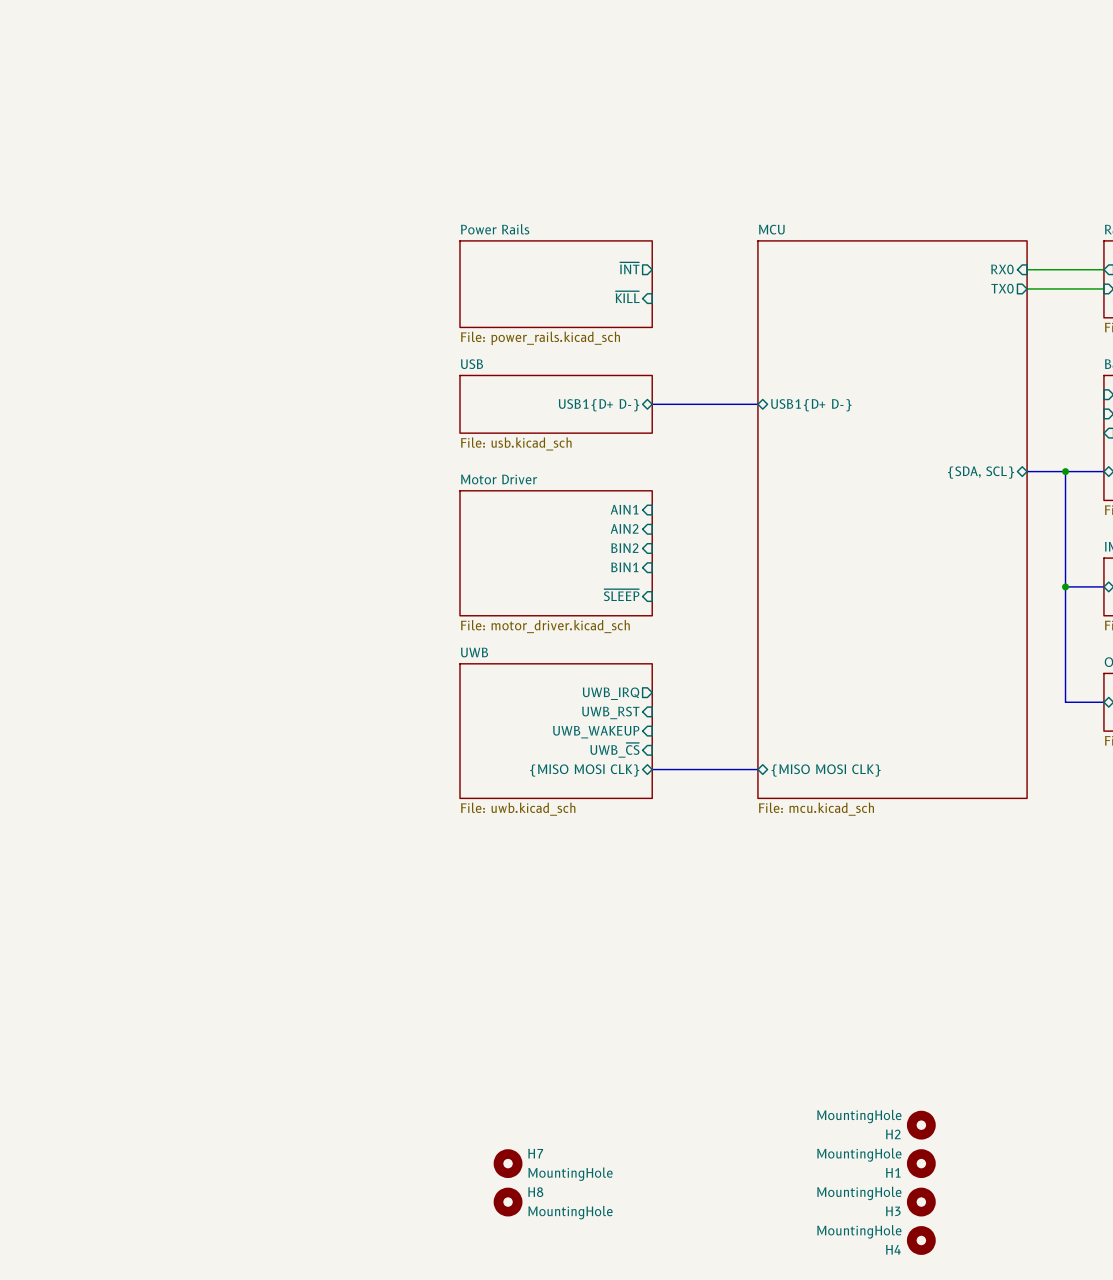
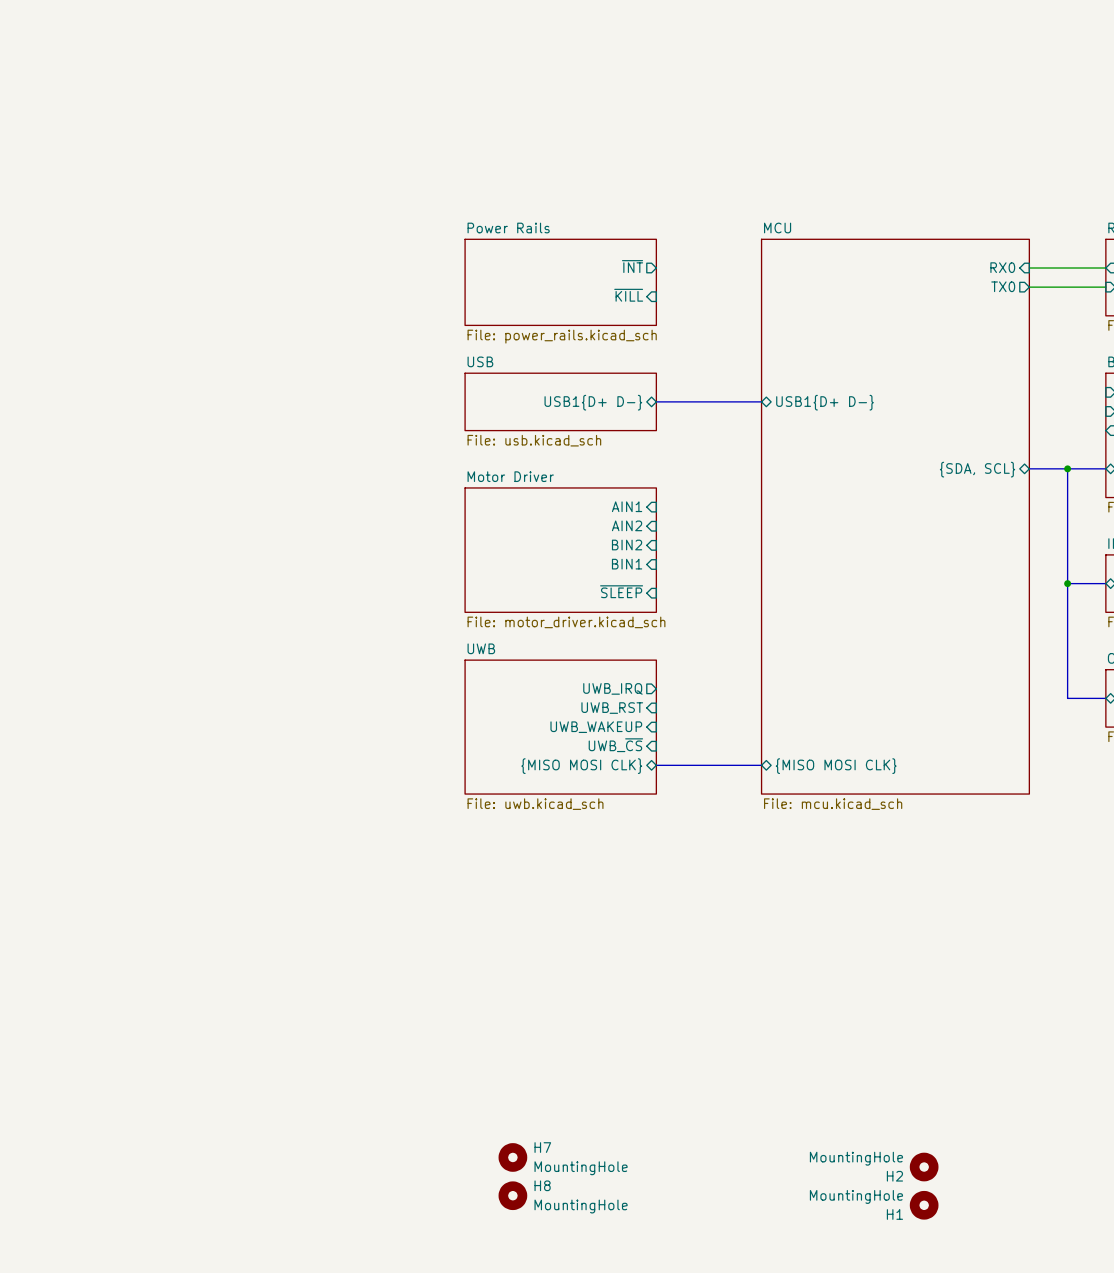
H2 position: (921, 1125) -> (924, 1167)
H1 position: (921, 1163) -> (924, 1205)
H3: MountingHole (921, 1202) -> none
H4: MountingHole (921, 1240) -> none

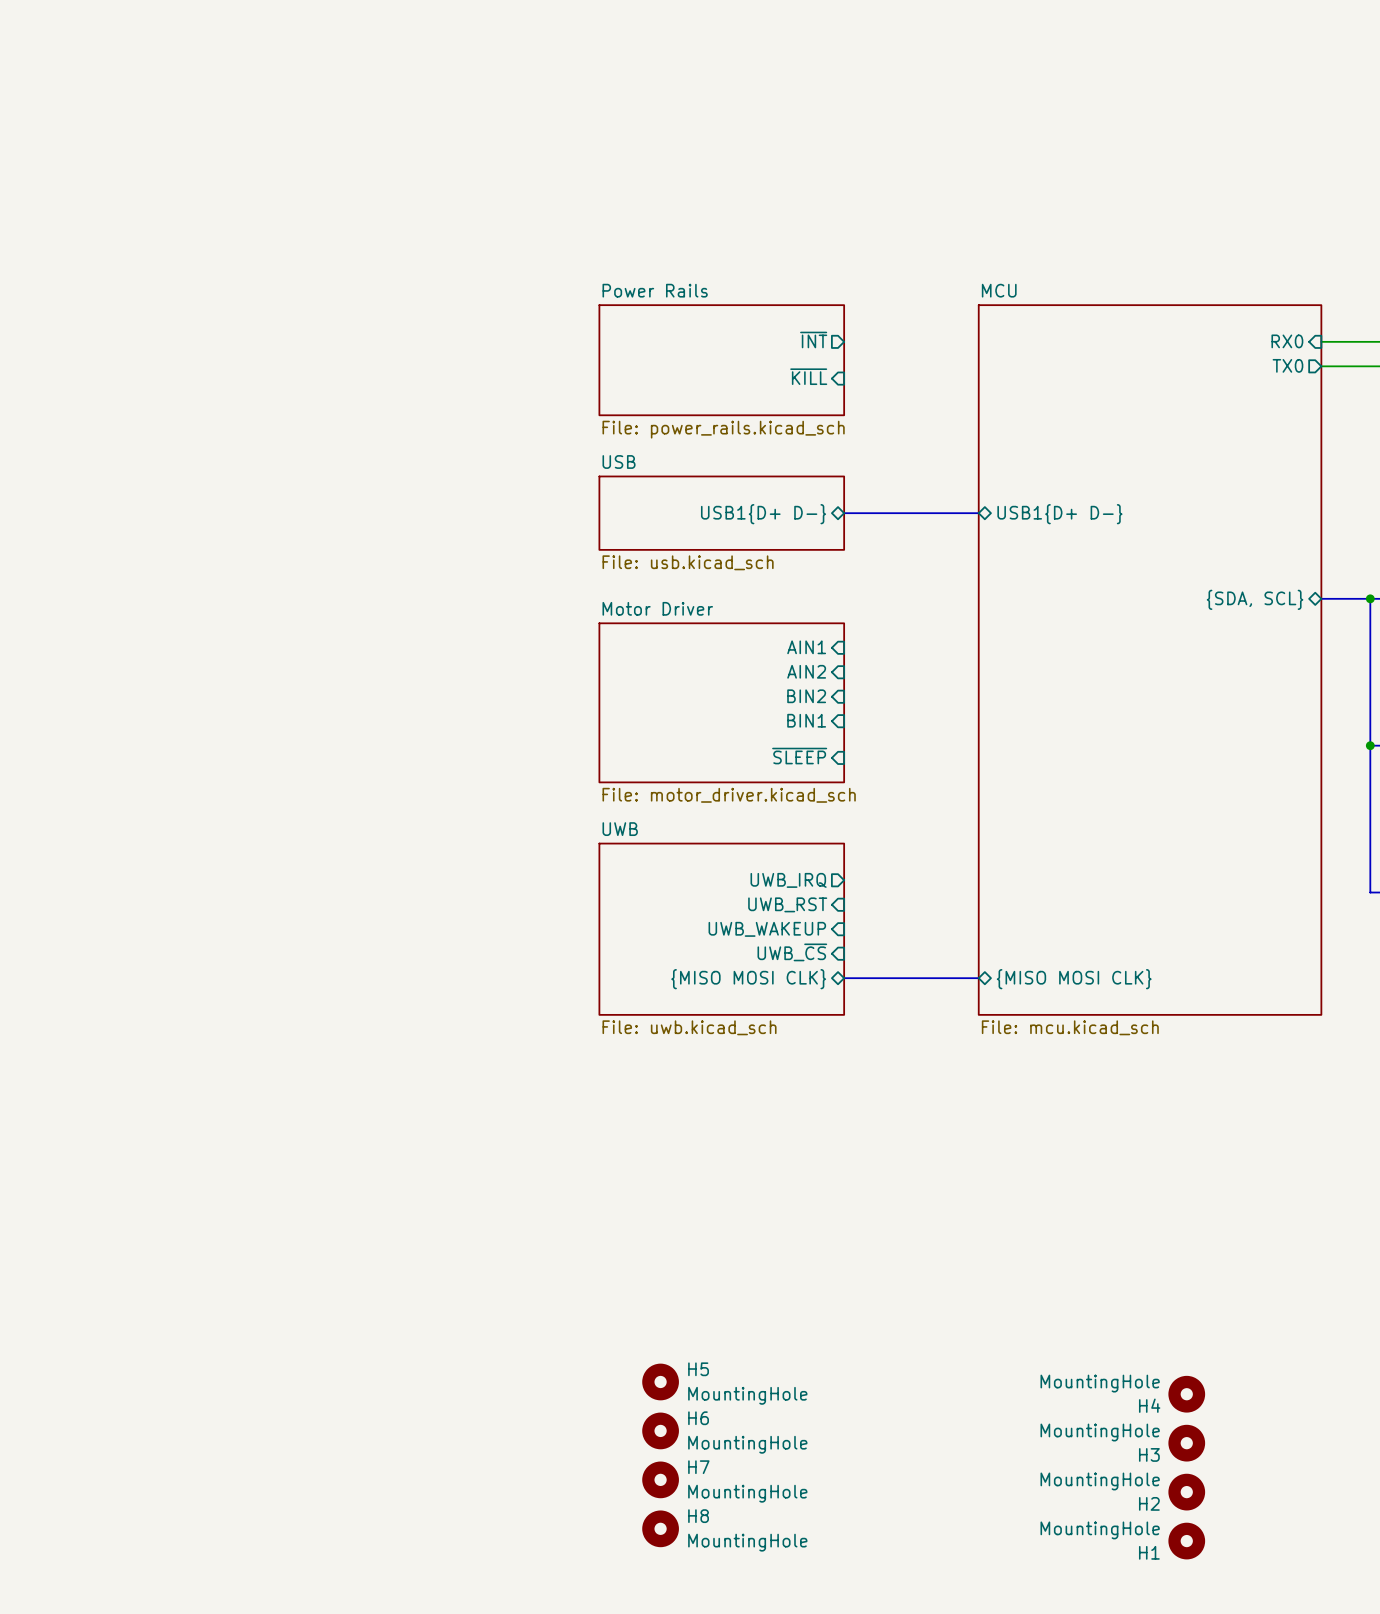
H5: none -> MountingHole (660, 1381)
H4: none -> MountingHole (1186, 1394)
H6: none -> MountingHole (660, 1430)
H3: none -> MountingHole (1186, 1443)

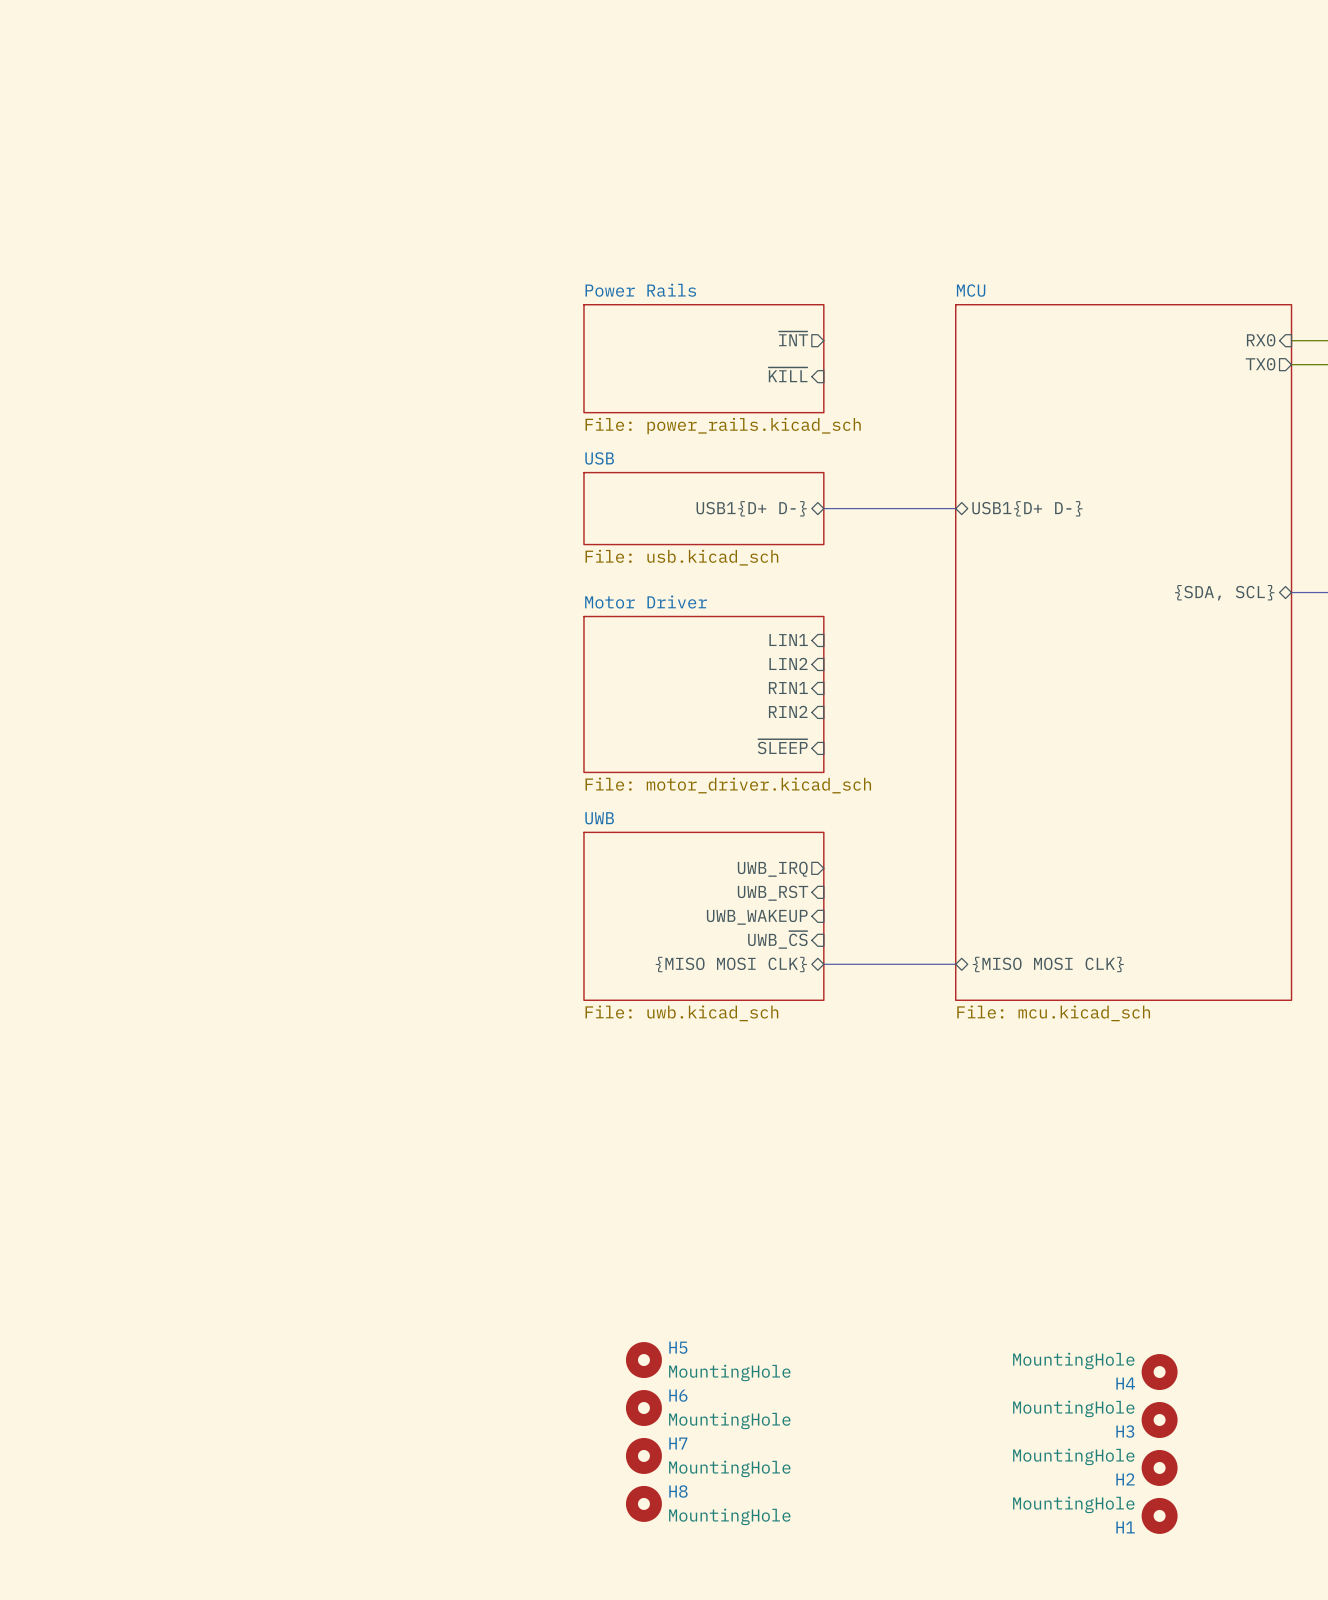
sheet pin: AIN1 (806, 647) -> LIN1 (788, 640)
sheet pin: AIN2 (806, 671) -> LIN2 (788, 663)
sheet pin: BIN2 (806, 696) -> RIN1 (788, 688)
sheet pin: BIN1 (806, 720) -> RIN2 (788, 711)

